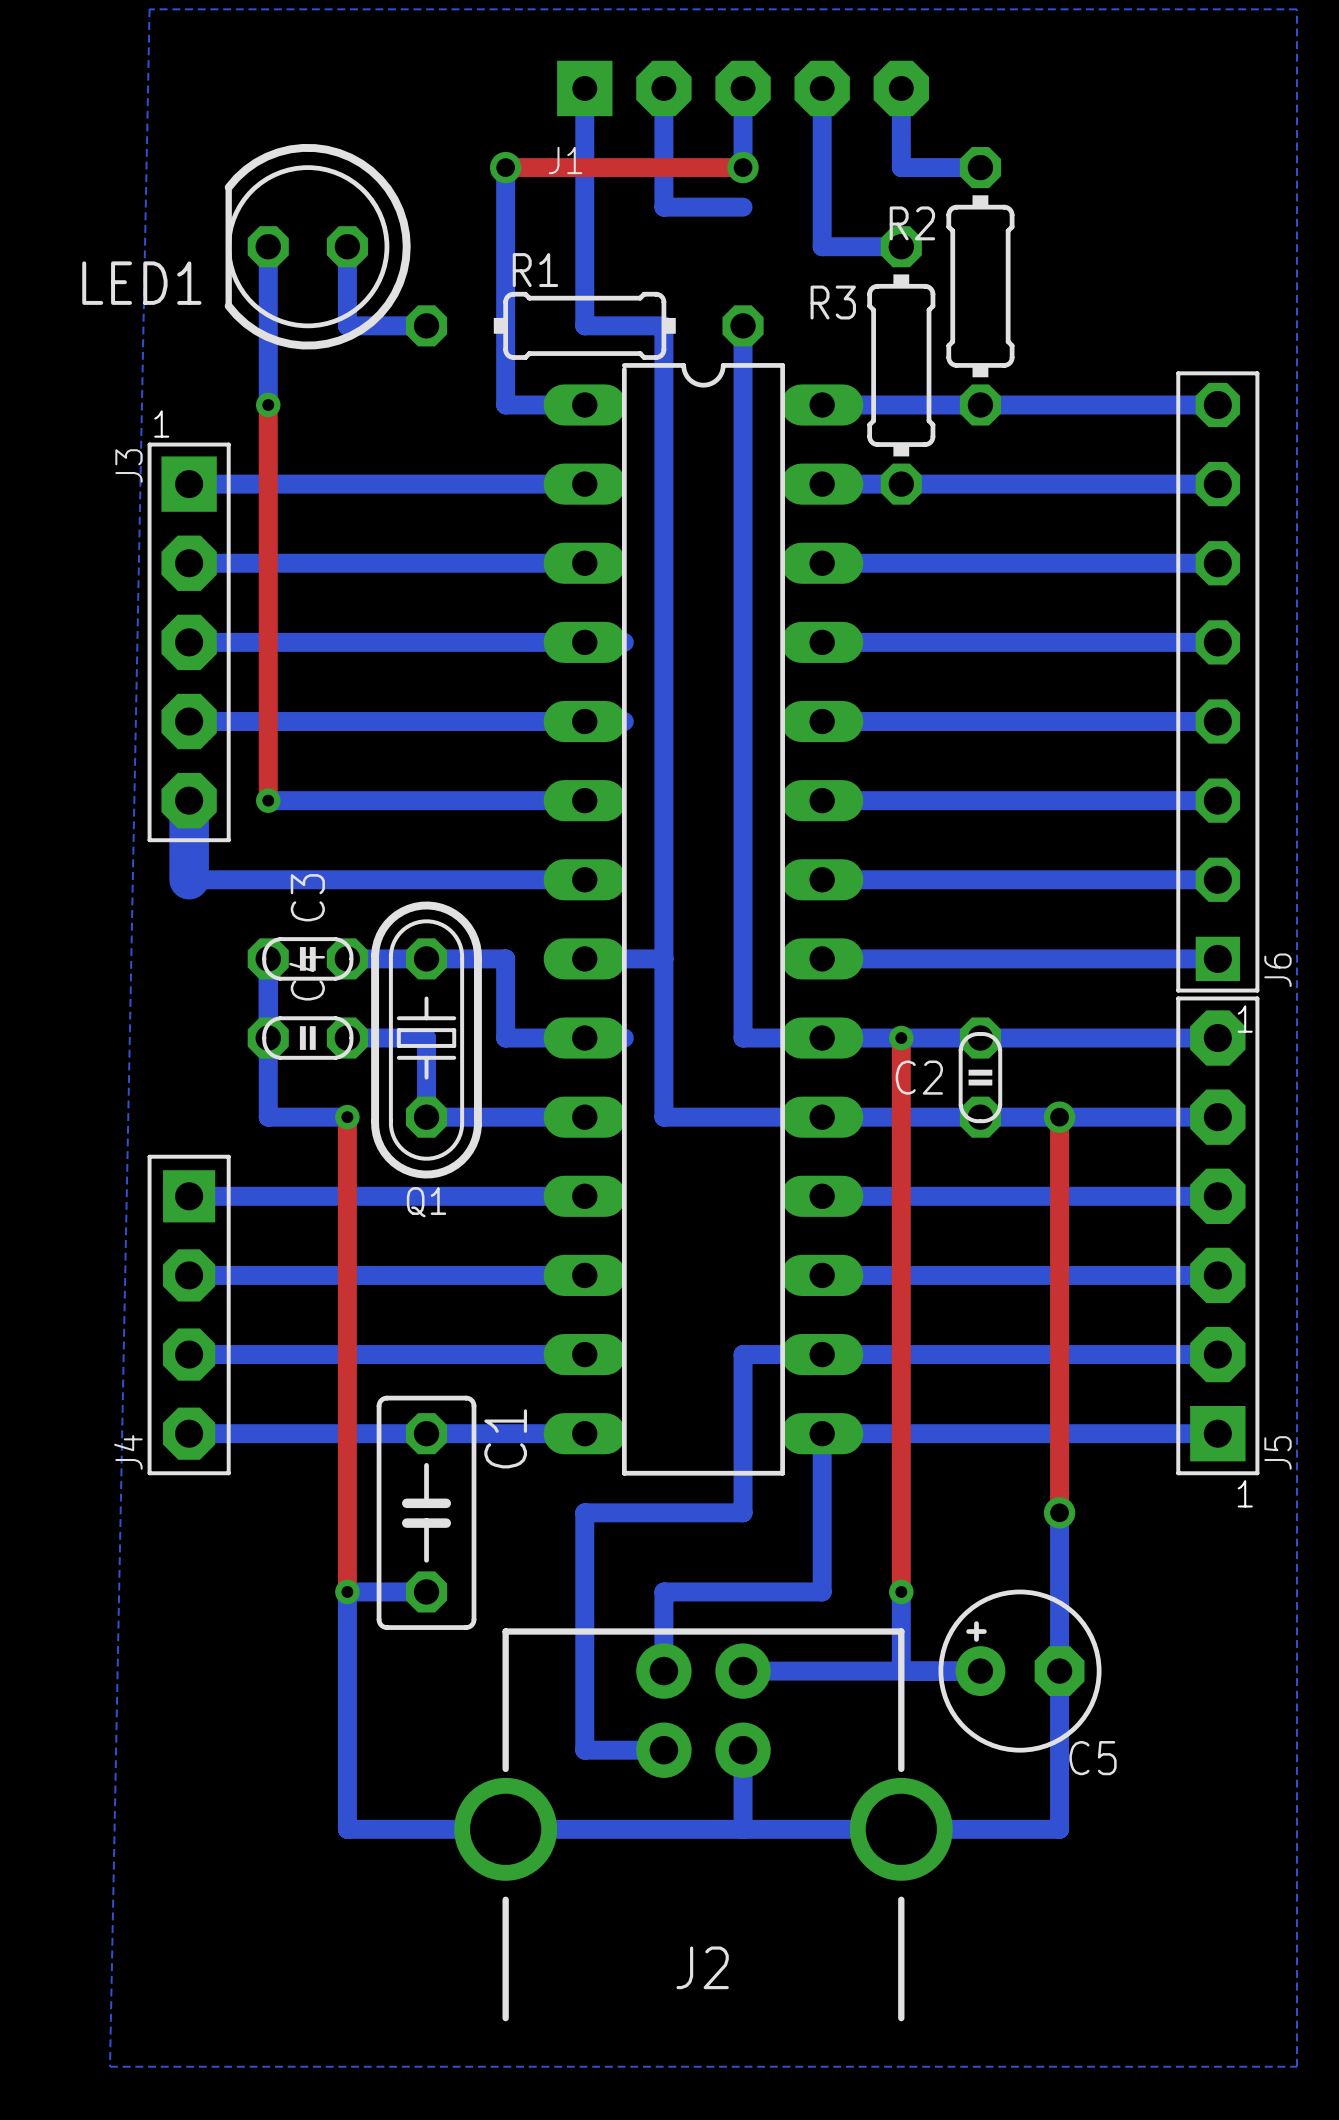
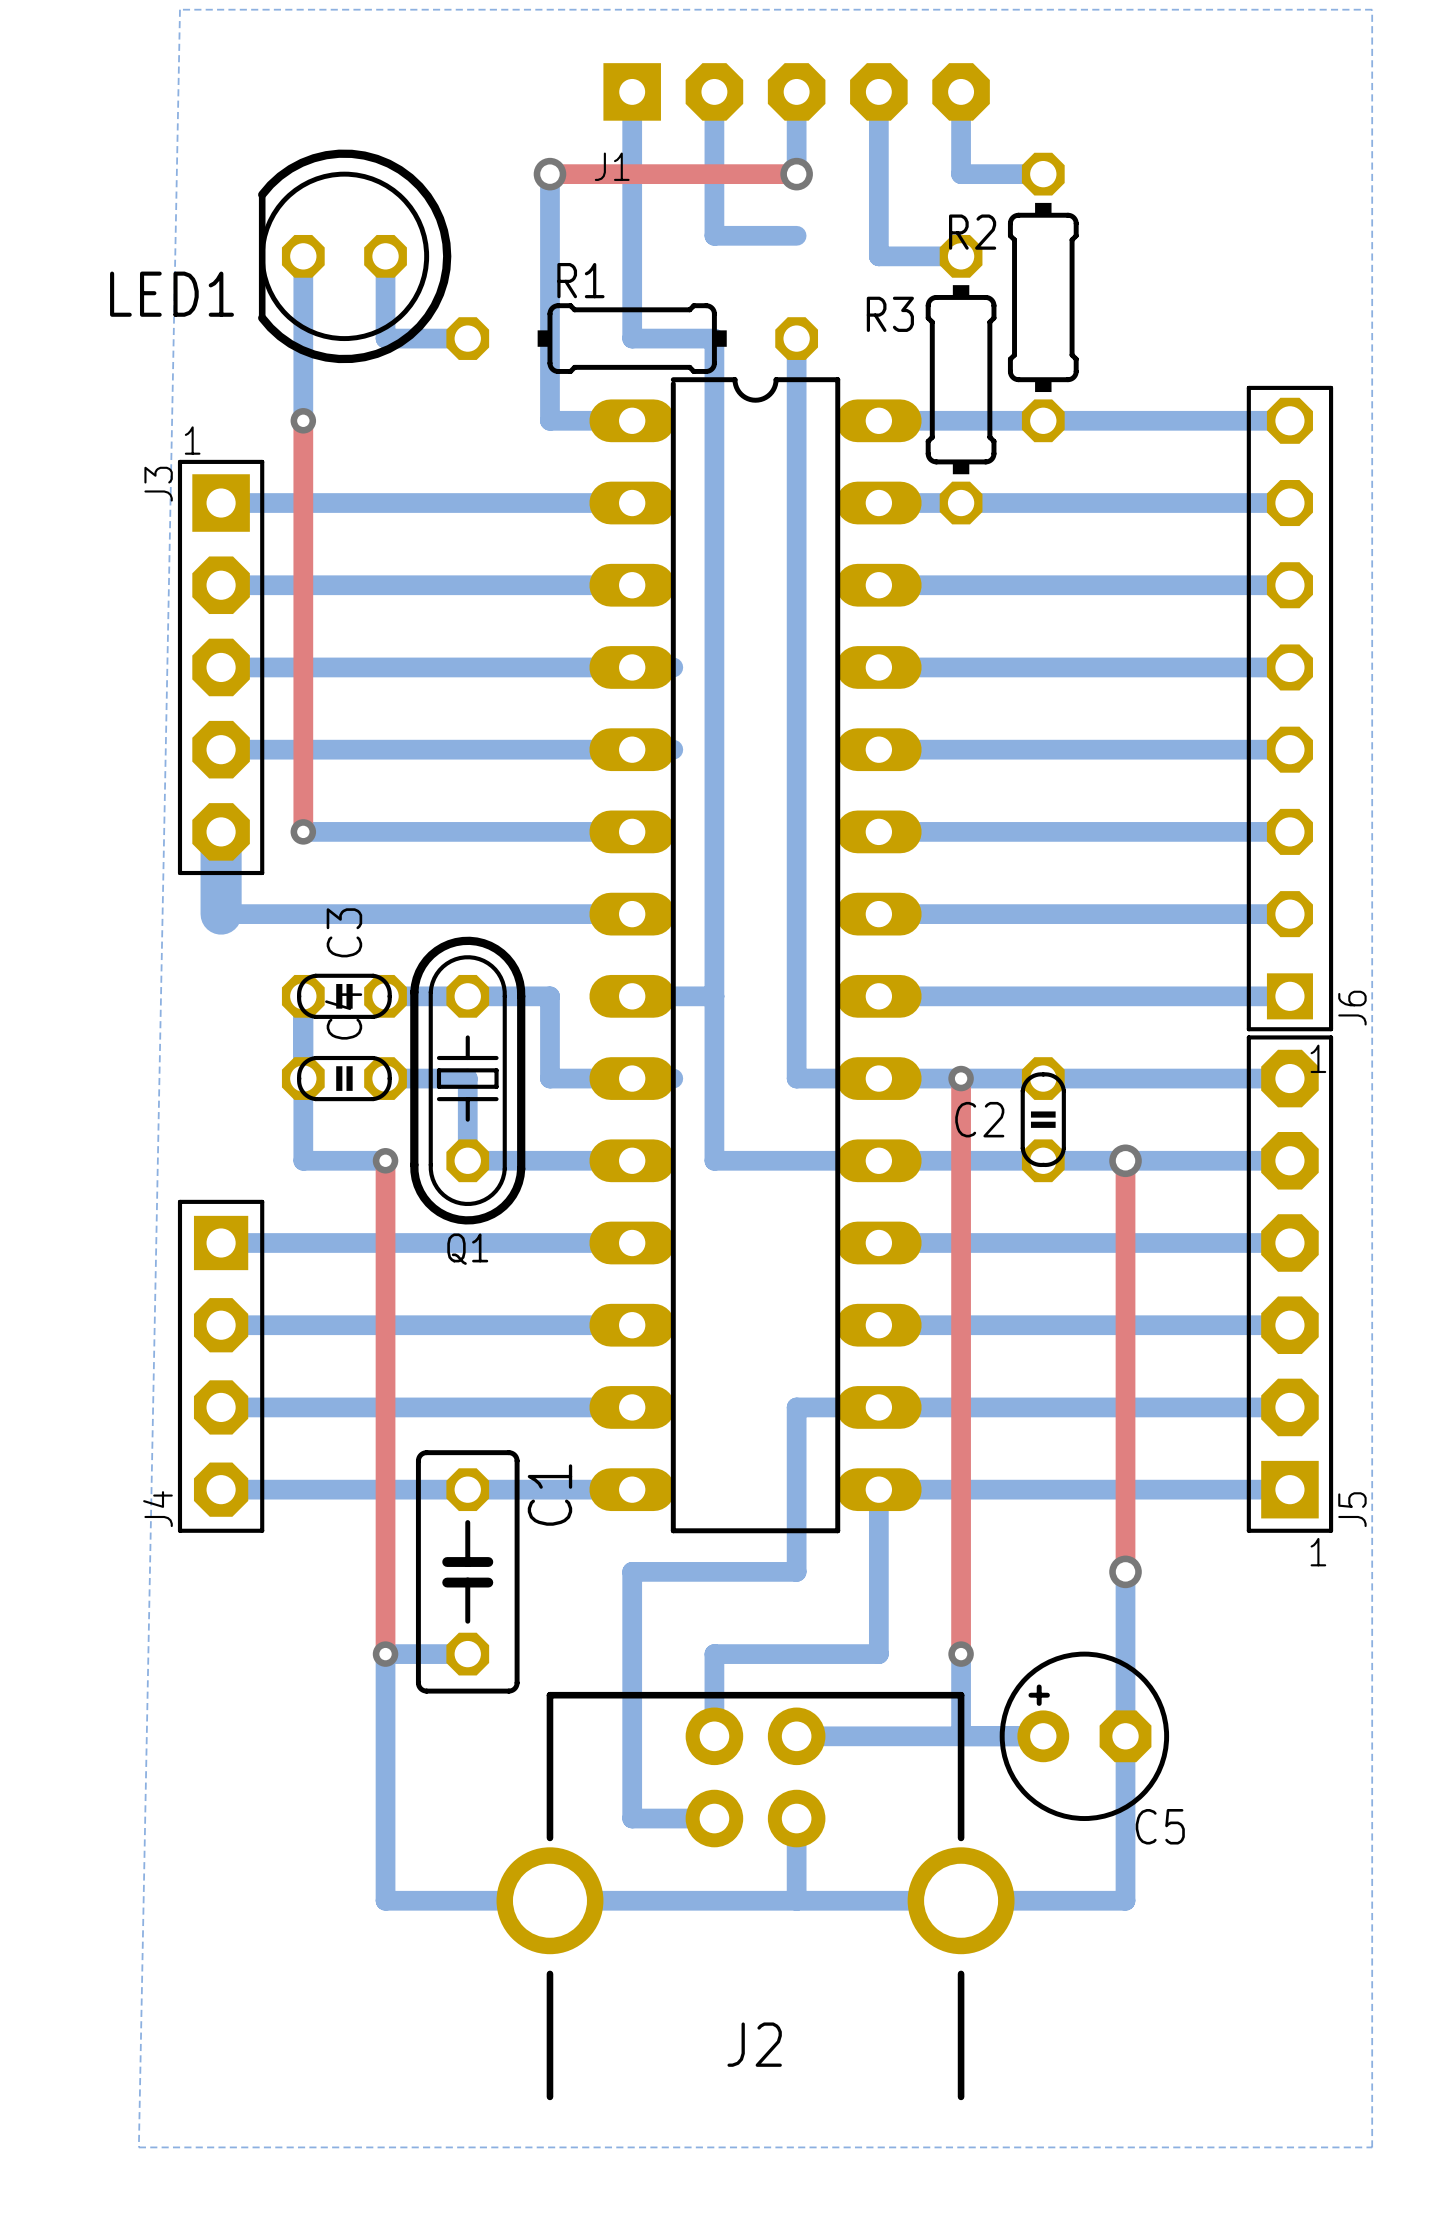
bottom track: (663, 207) (743, 207) -> (714, 215) (714, 235) (796, 235)

